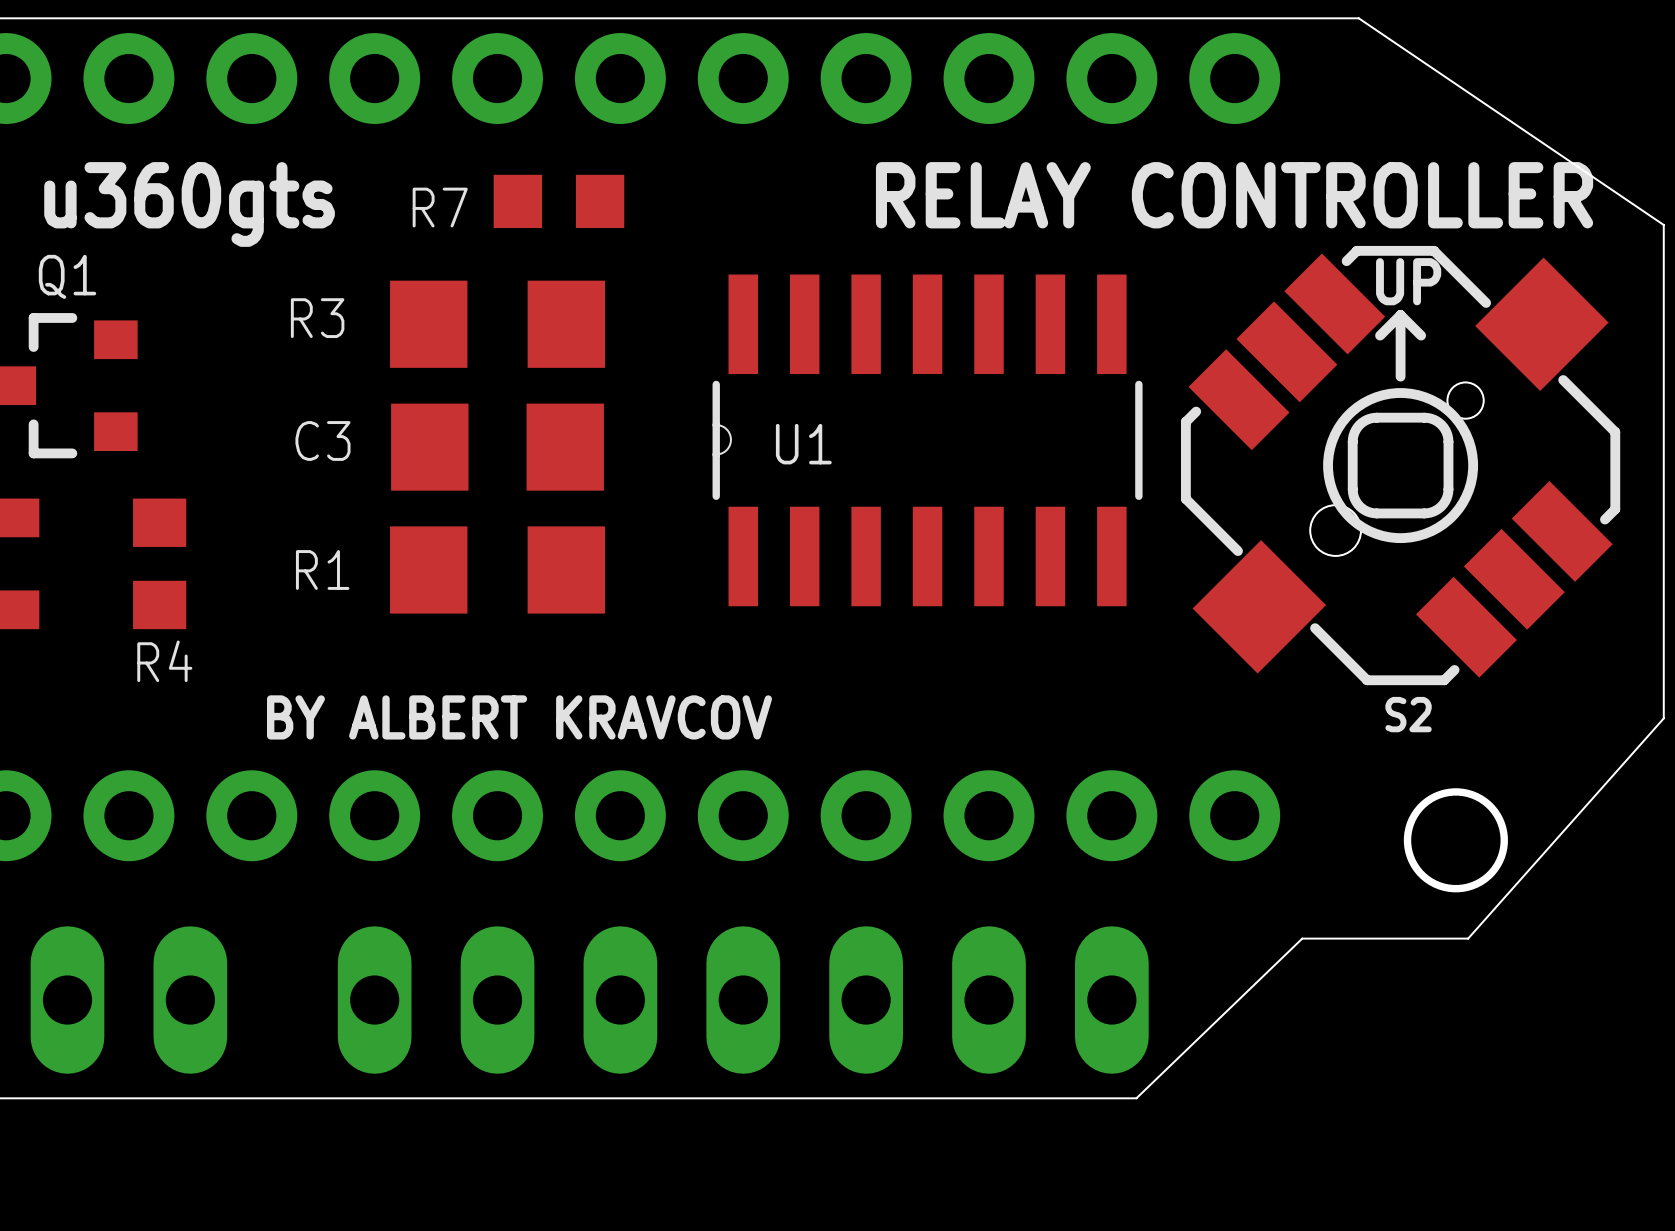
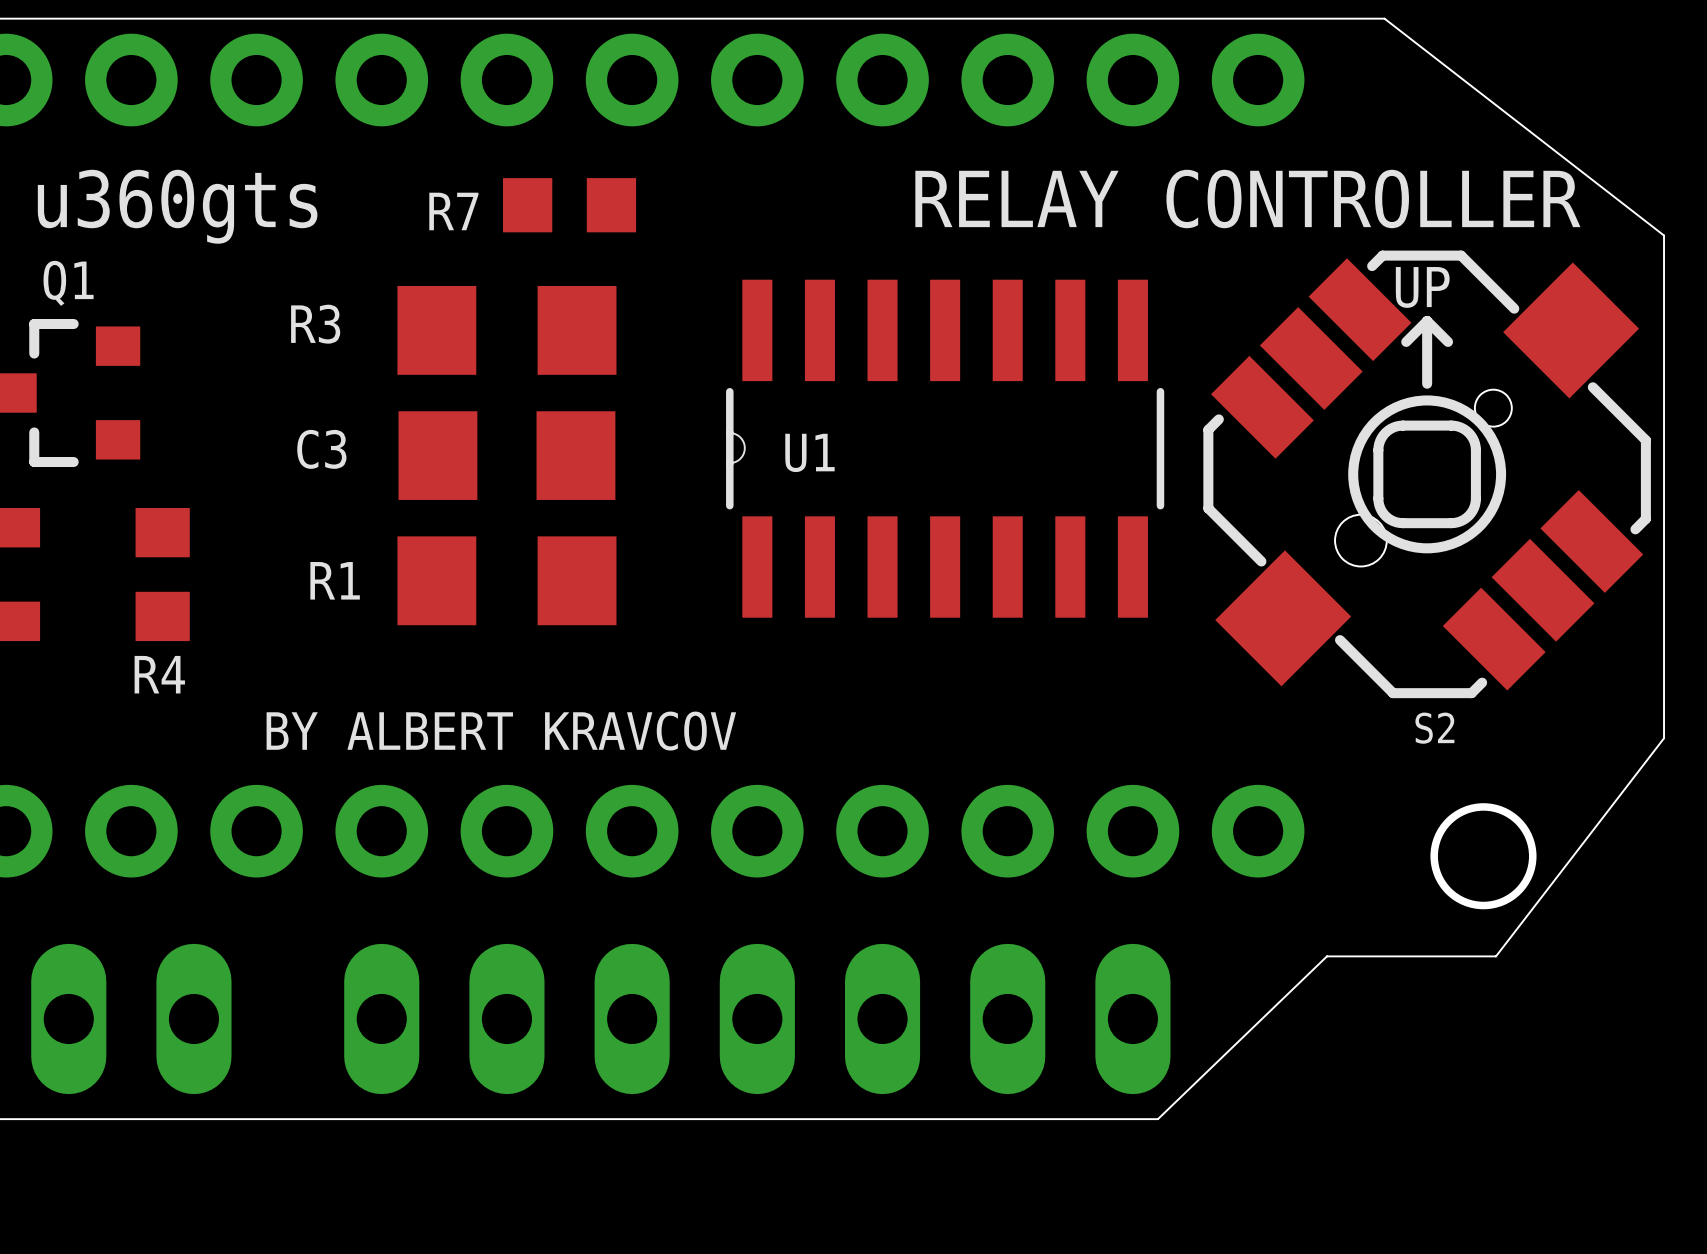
board edge: (1358, 18) (1663, 225) (1663, 718) (1468, 938) -> (1384, 18) (1664, 235) (1664, 738) (1495, 956)

